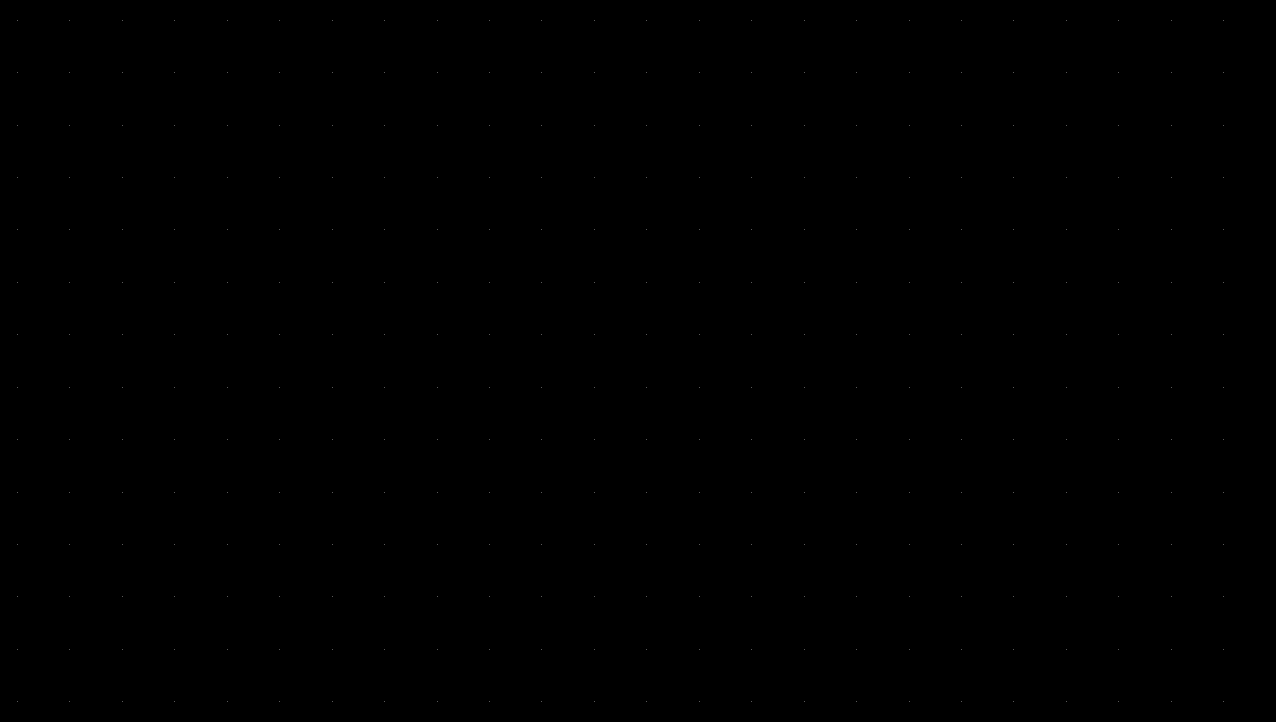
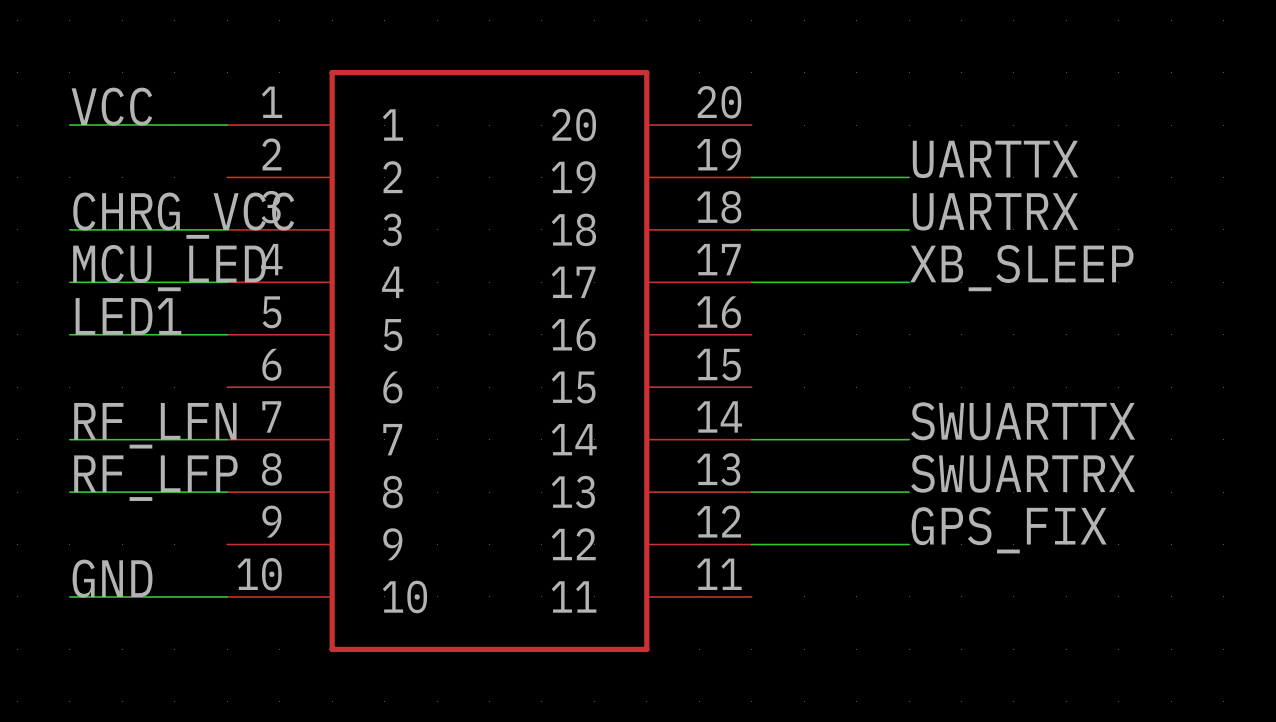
label: none -> VCC (111, 106)
wire: none -> (69, 125) (227, 125)
label: none -> UARTTX (995, 159)
wire: none -> (751, 177) (909, 177)
label: none -> UARTRX (995, 211)
label: none -> CHRG_VCC (183, 215)
wire: none -> (69, 229) (227, 229)
wire: none -> (751, 229) (909, 229)
label: none -> MCU_LED (169, 268)
label: none -> XB_SLEEP (1021, 268)
wire: none -> (69, 282) (227, 282)
wire: none -> (751, 282) (909, 282)
label: none -> LED1 (128, 316)
wire: none -> (69, 334) (227, 334)
part: none -> (489, 360)
label: none -> SWUARTTX (1023, 421)
label: none -> RF_LFN (155, 425)
wire: none -> (69, 439) (227, 439)
wire: none -> (751, 439) (909, 439)
label: none -> SWUARTRX (1023, 473)
label: none -> RF_LFP (155, 478)
wire: none -> (69, 492) (227, 492)
wire: none -> (751, 492) (909, 492)
label: none -> GPS_FIX (1009, 530)
wire: none -> (751, 544) (909, 544)
label: none -> GND (112, 578)
wire: none -> (69, 596) (227, 596)

